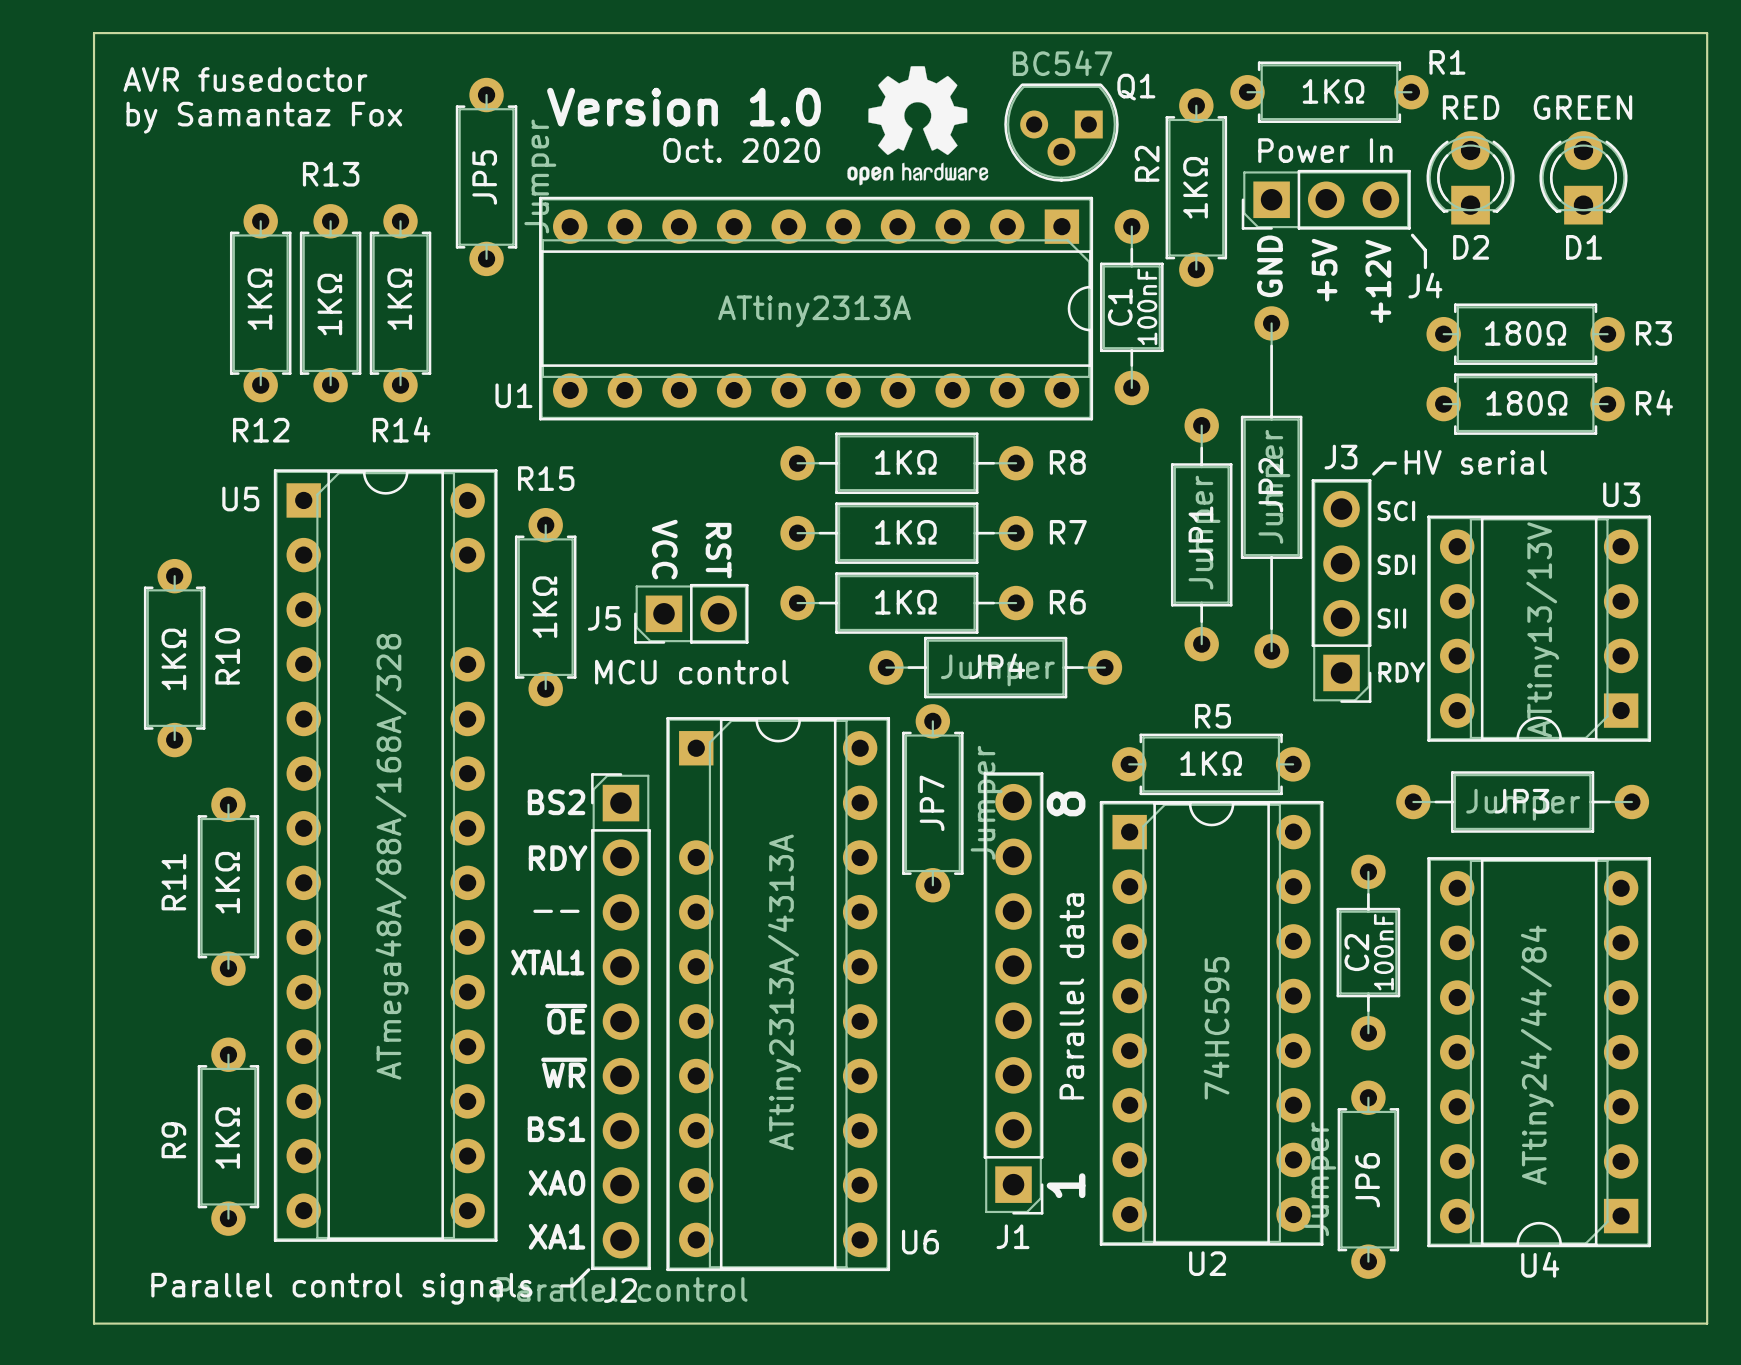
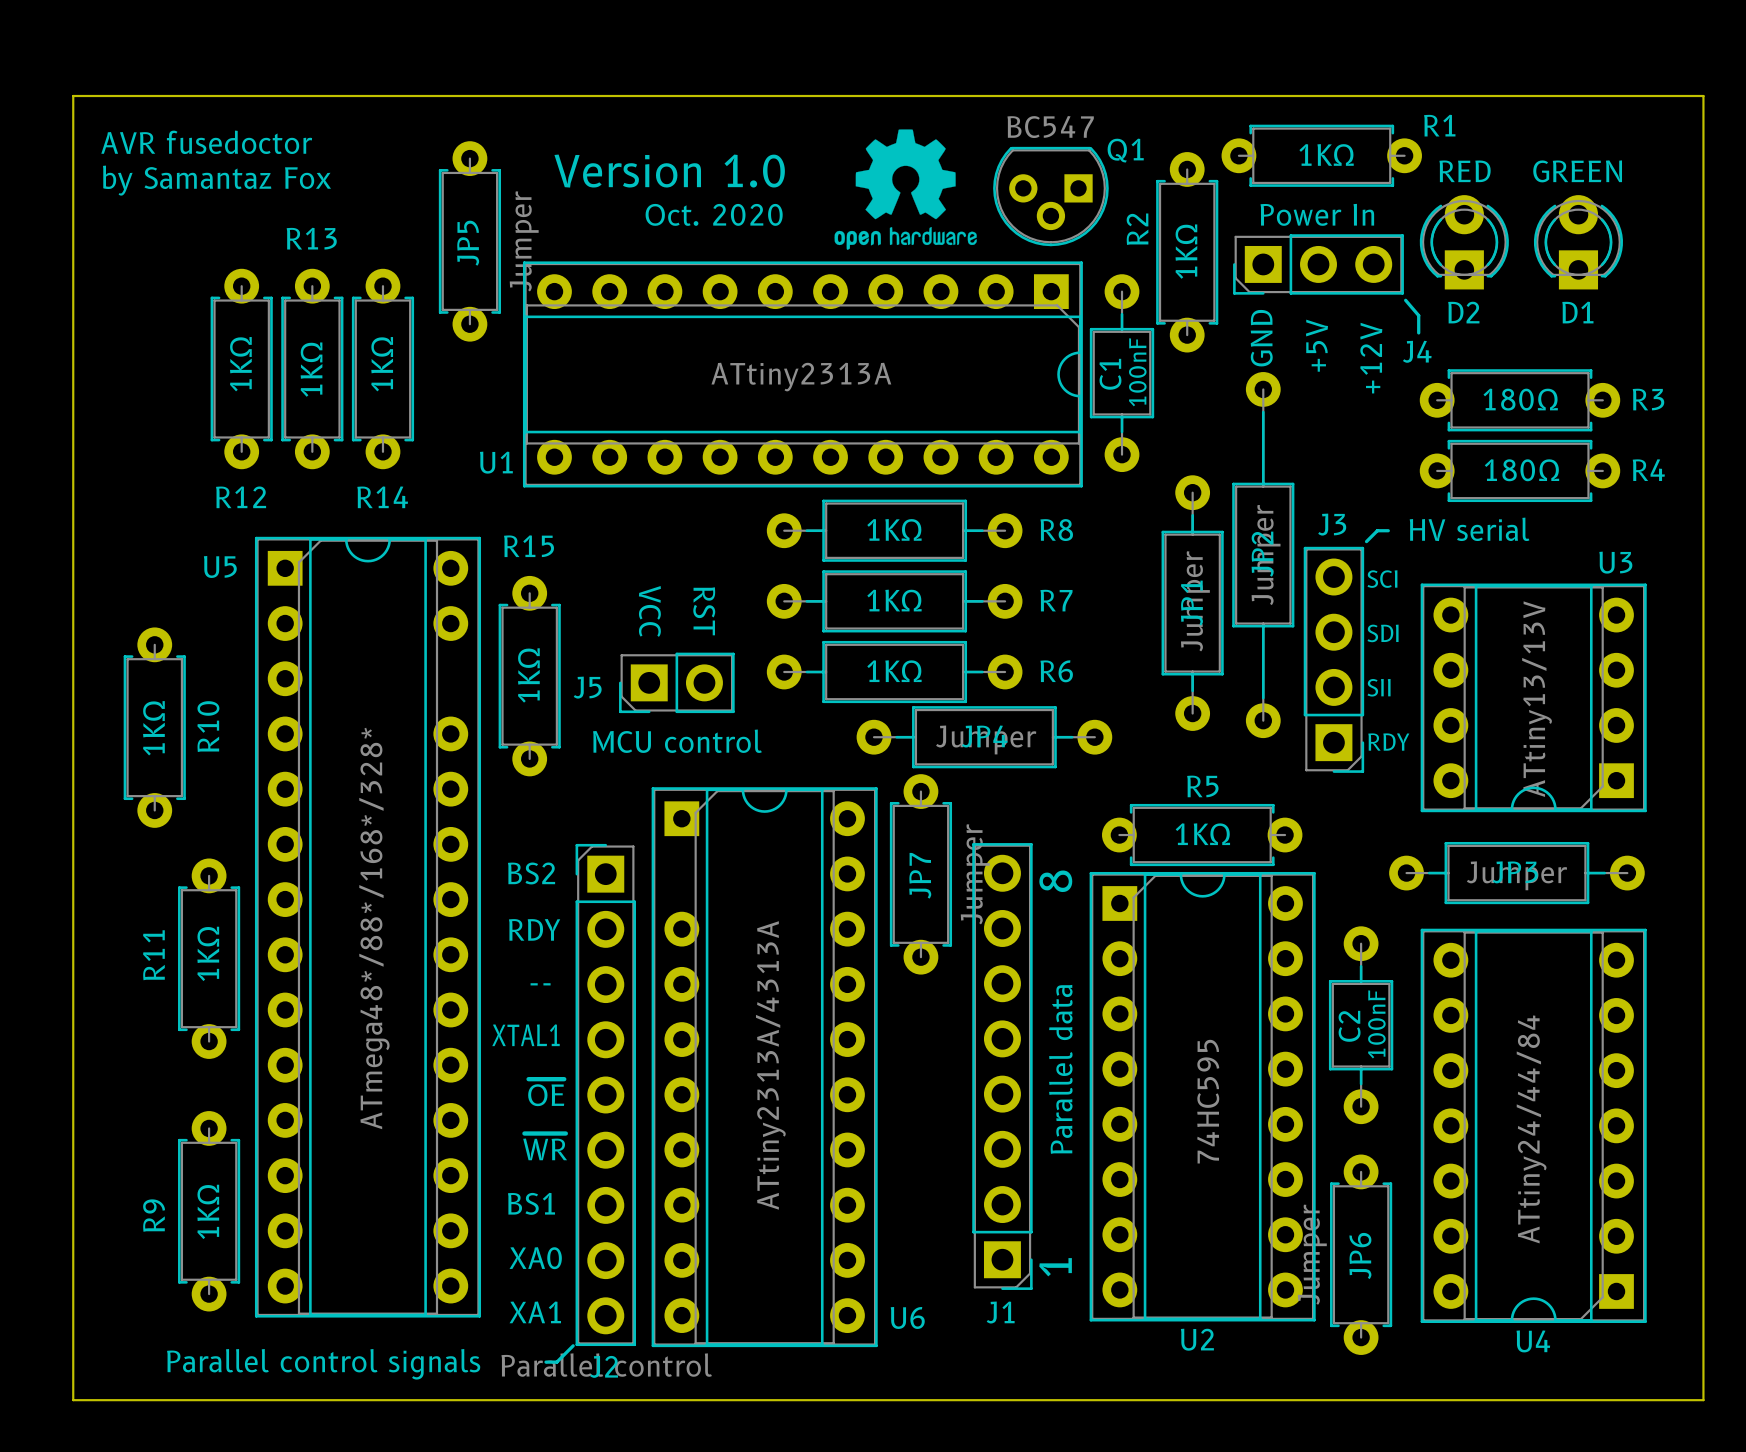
U5 value: ATmega48A/88A/168A/328 (392, 856) -> ATmega48*/88*/168*/328* (374, 928)

